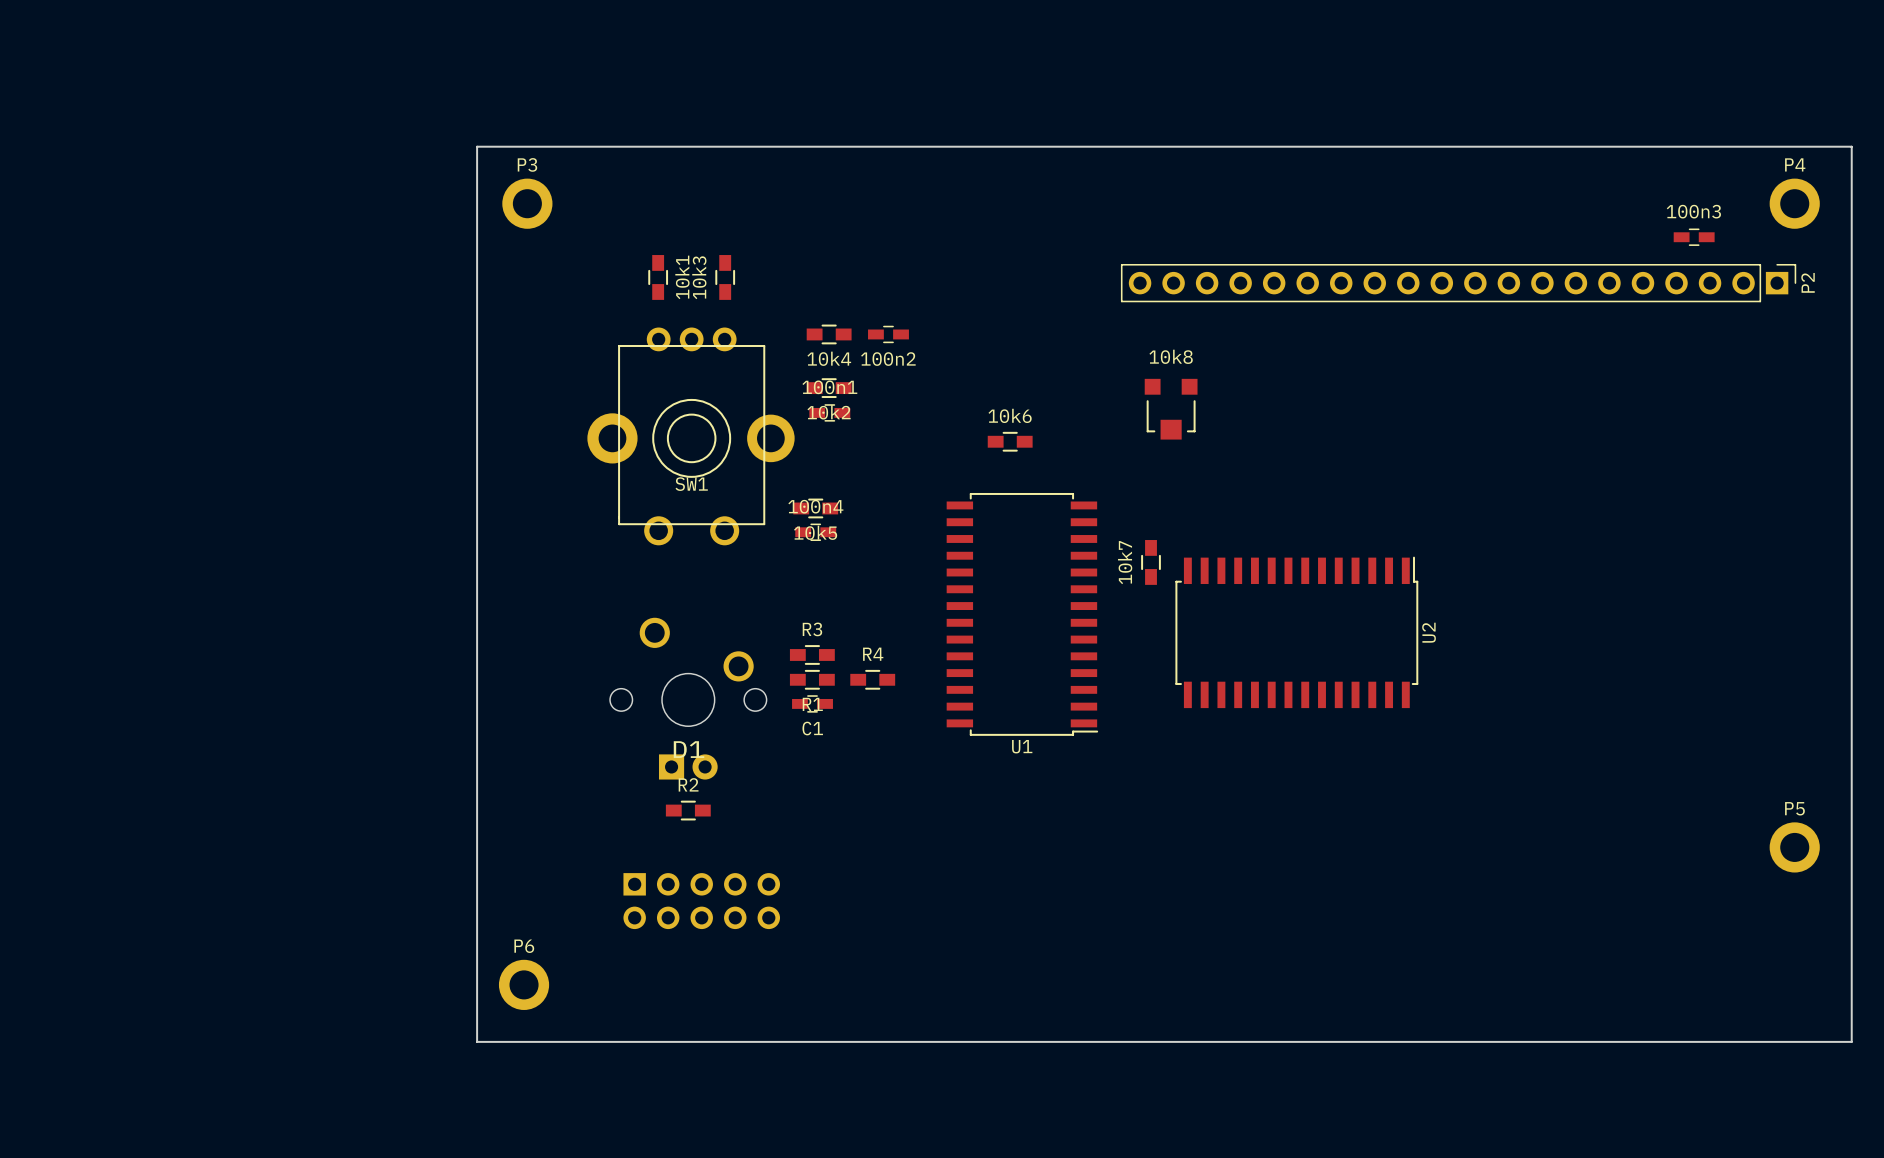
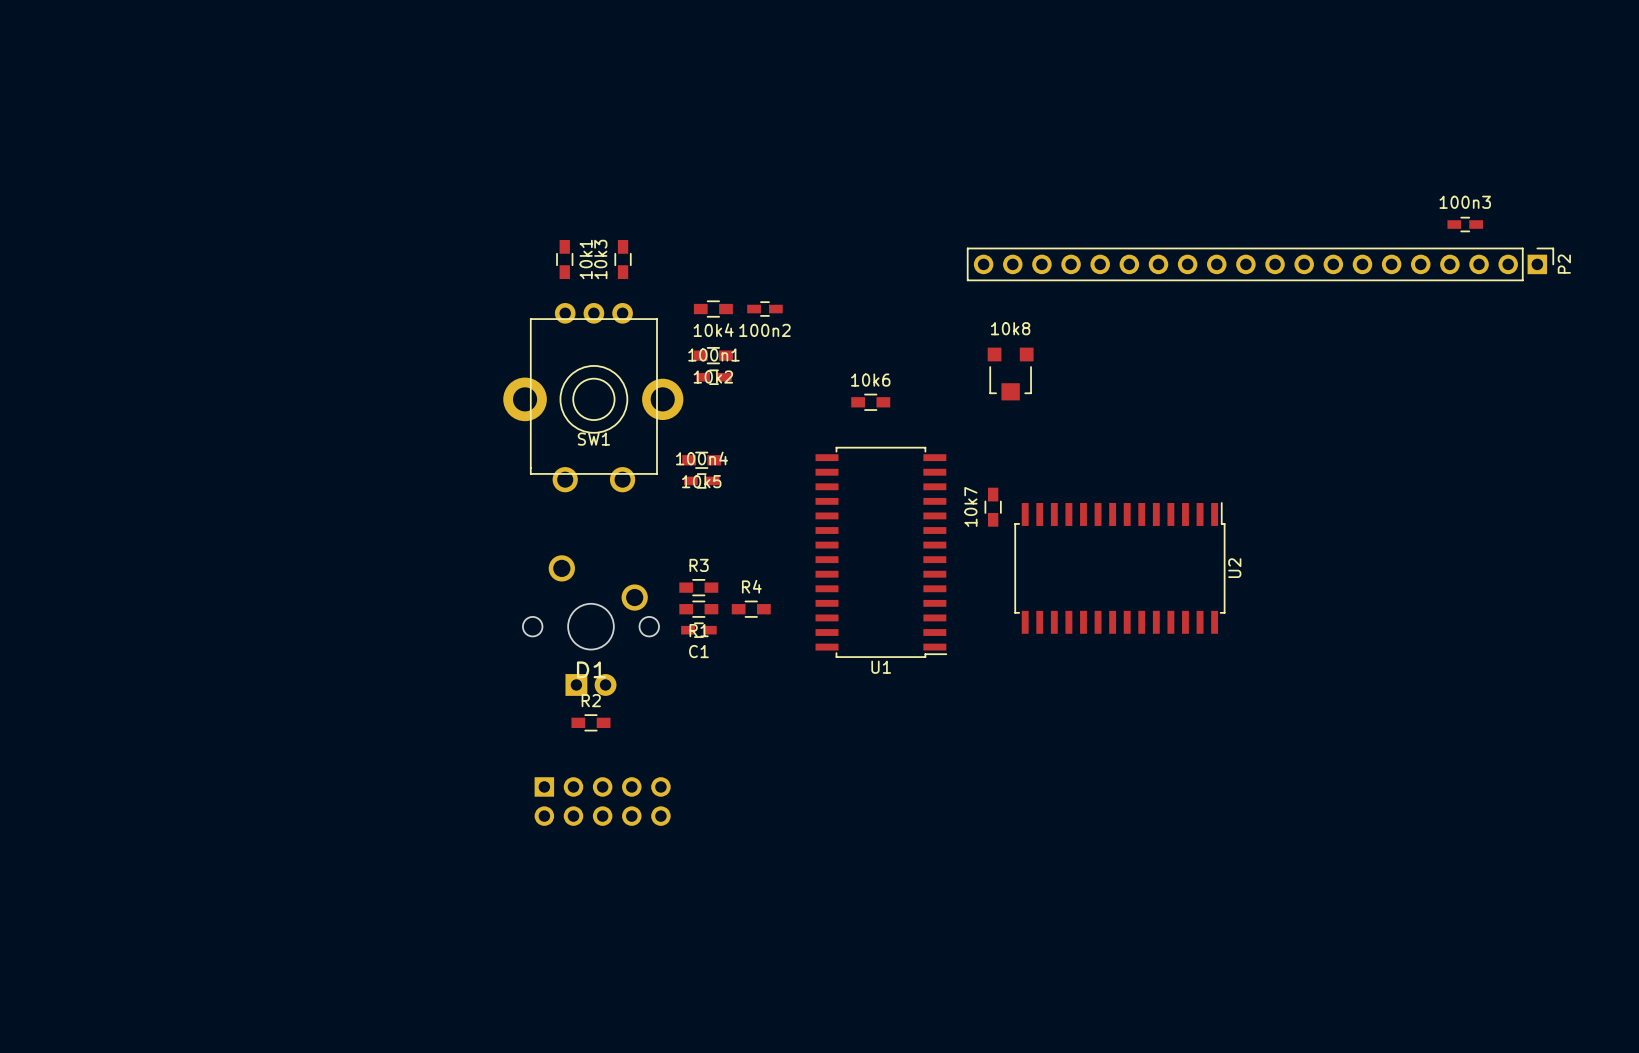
board edge: (477, 146) (1851, 146) (1851, 1041) (477, 1041) (477, 146) -> none
P3: (527, 203) -> none
P4: (1794, 203) -> none
P5: (1794, 847) -> none
P6: (524, 984) -> none

